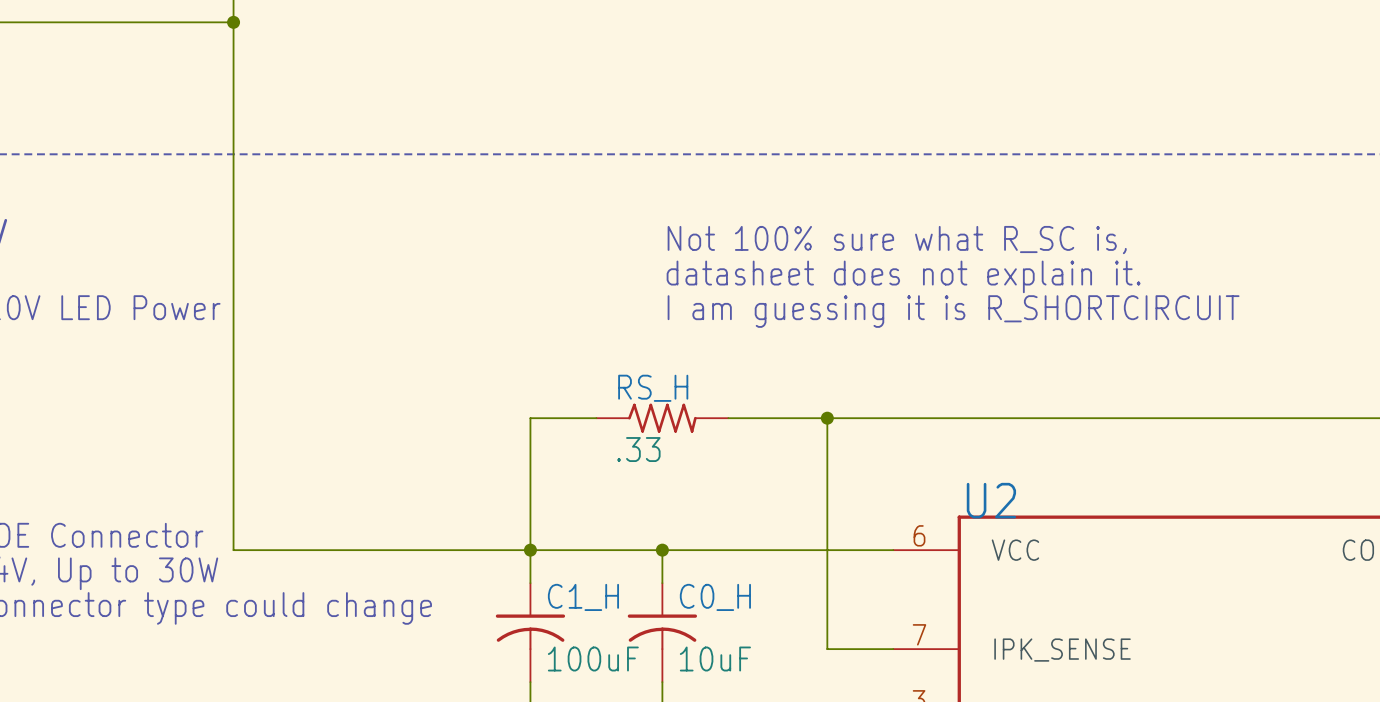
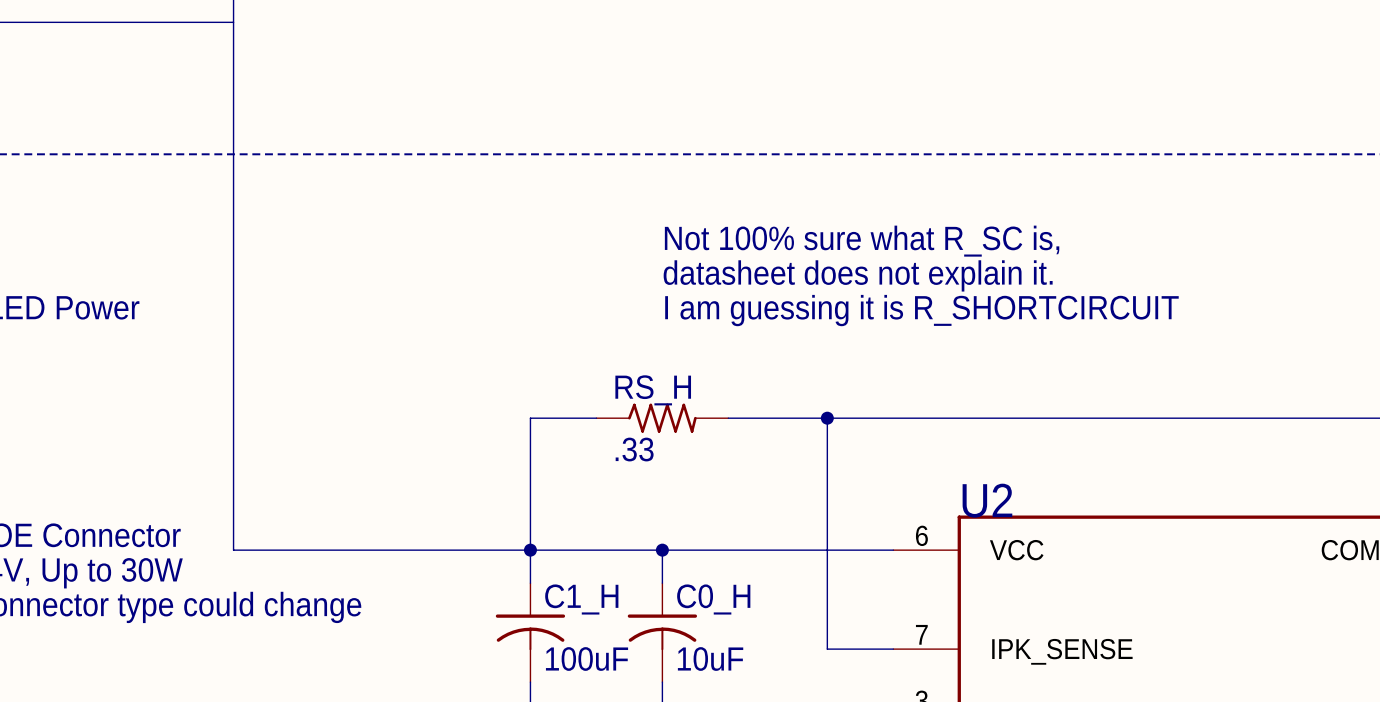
junction: (233, 22) -> none

